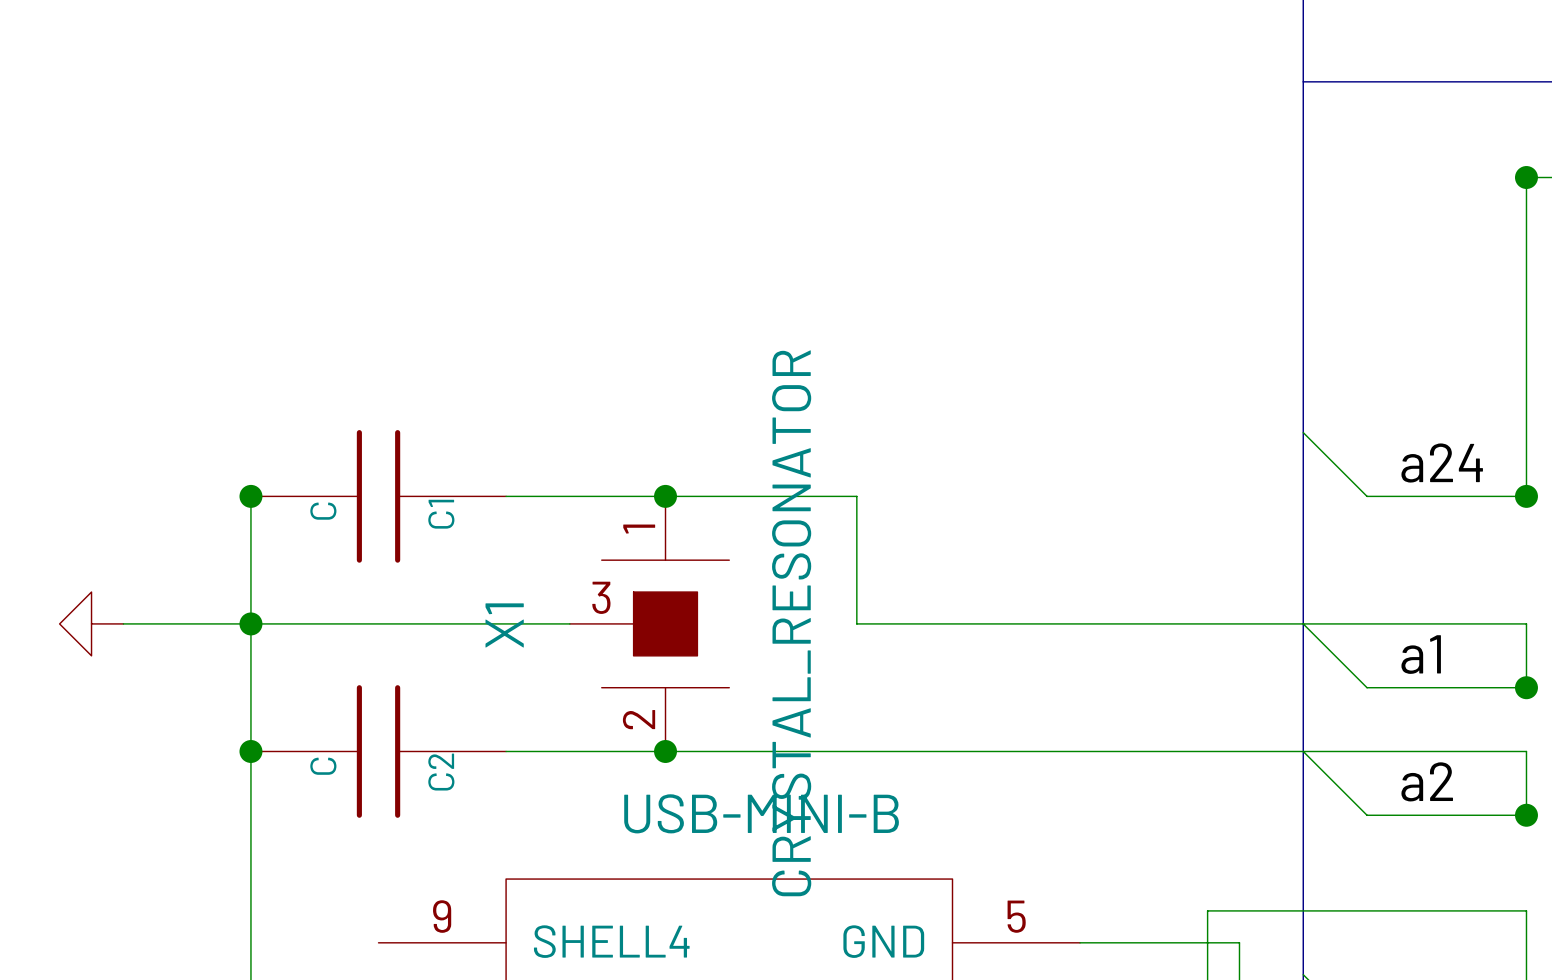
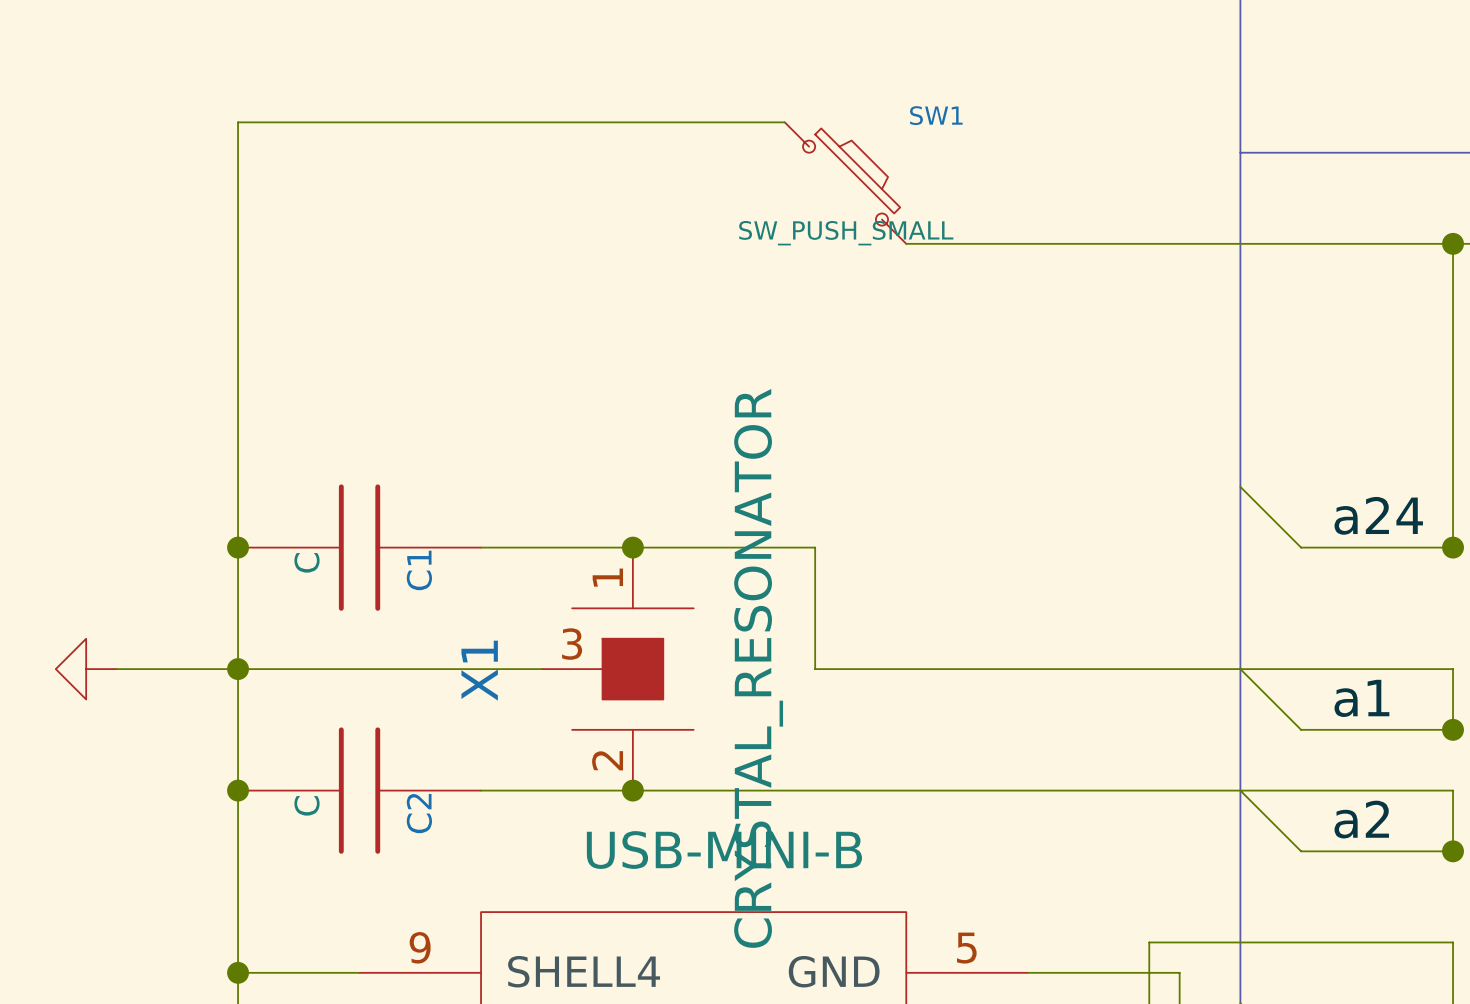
wire: none -> (784, 122) (238, 122) (238, 547)
SW1: none -> SW_PUSH_SMALL (845, 183)
wire: none -> (906, 243) (1453, 243)
wire: none -> (238, 972) (359, 972)
junction: none -> (238, 972)

